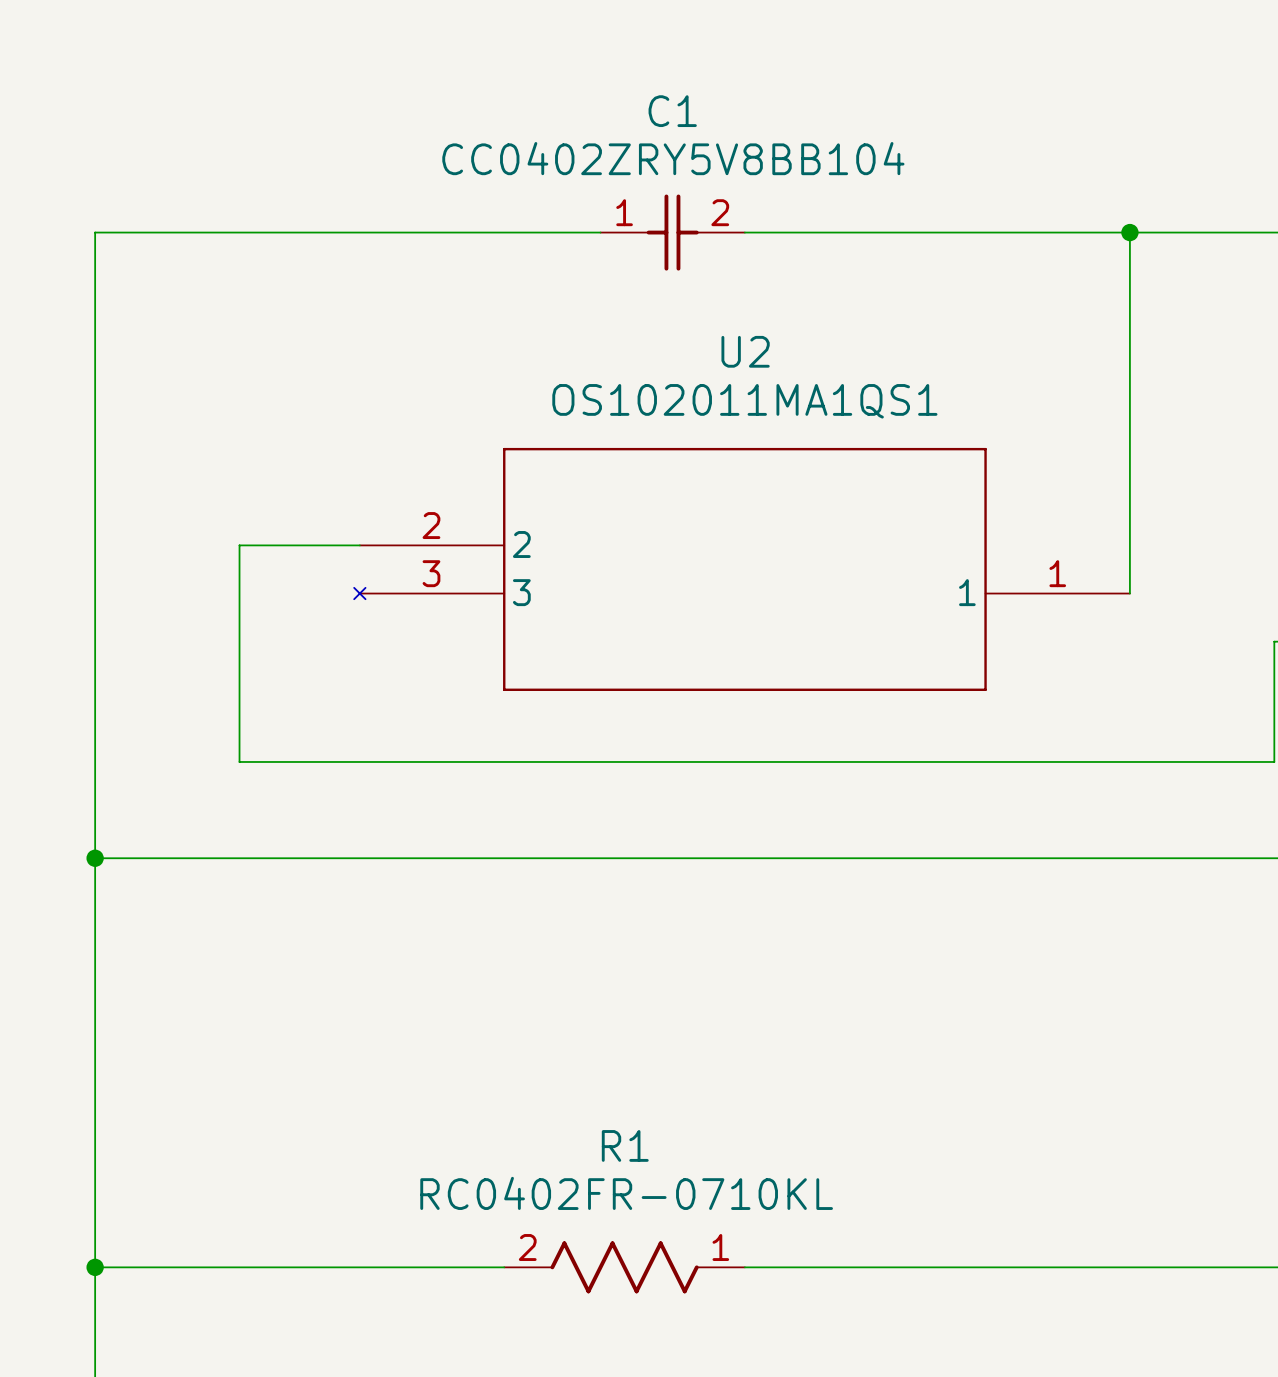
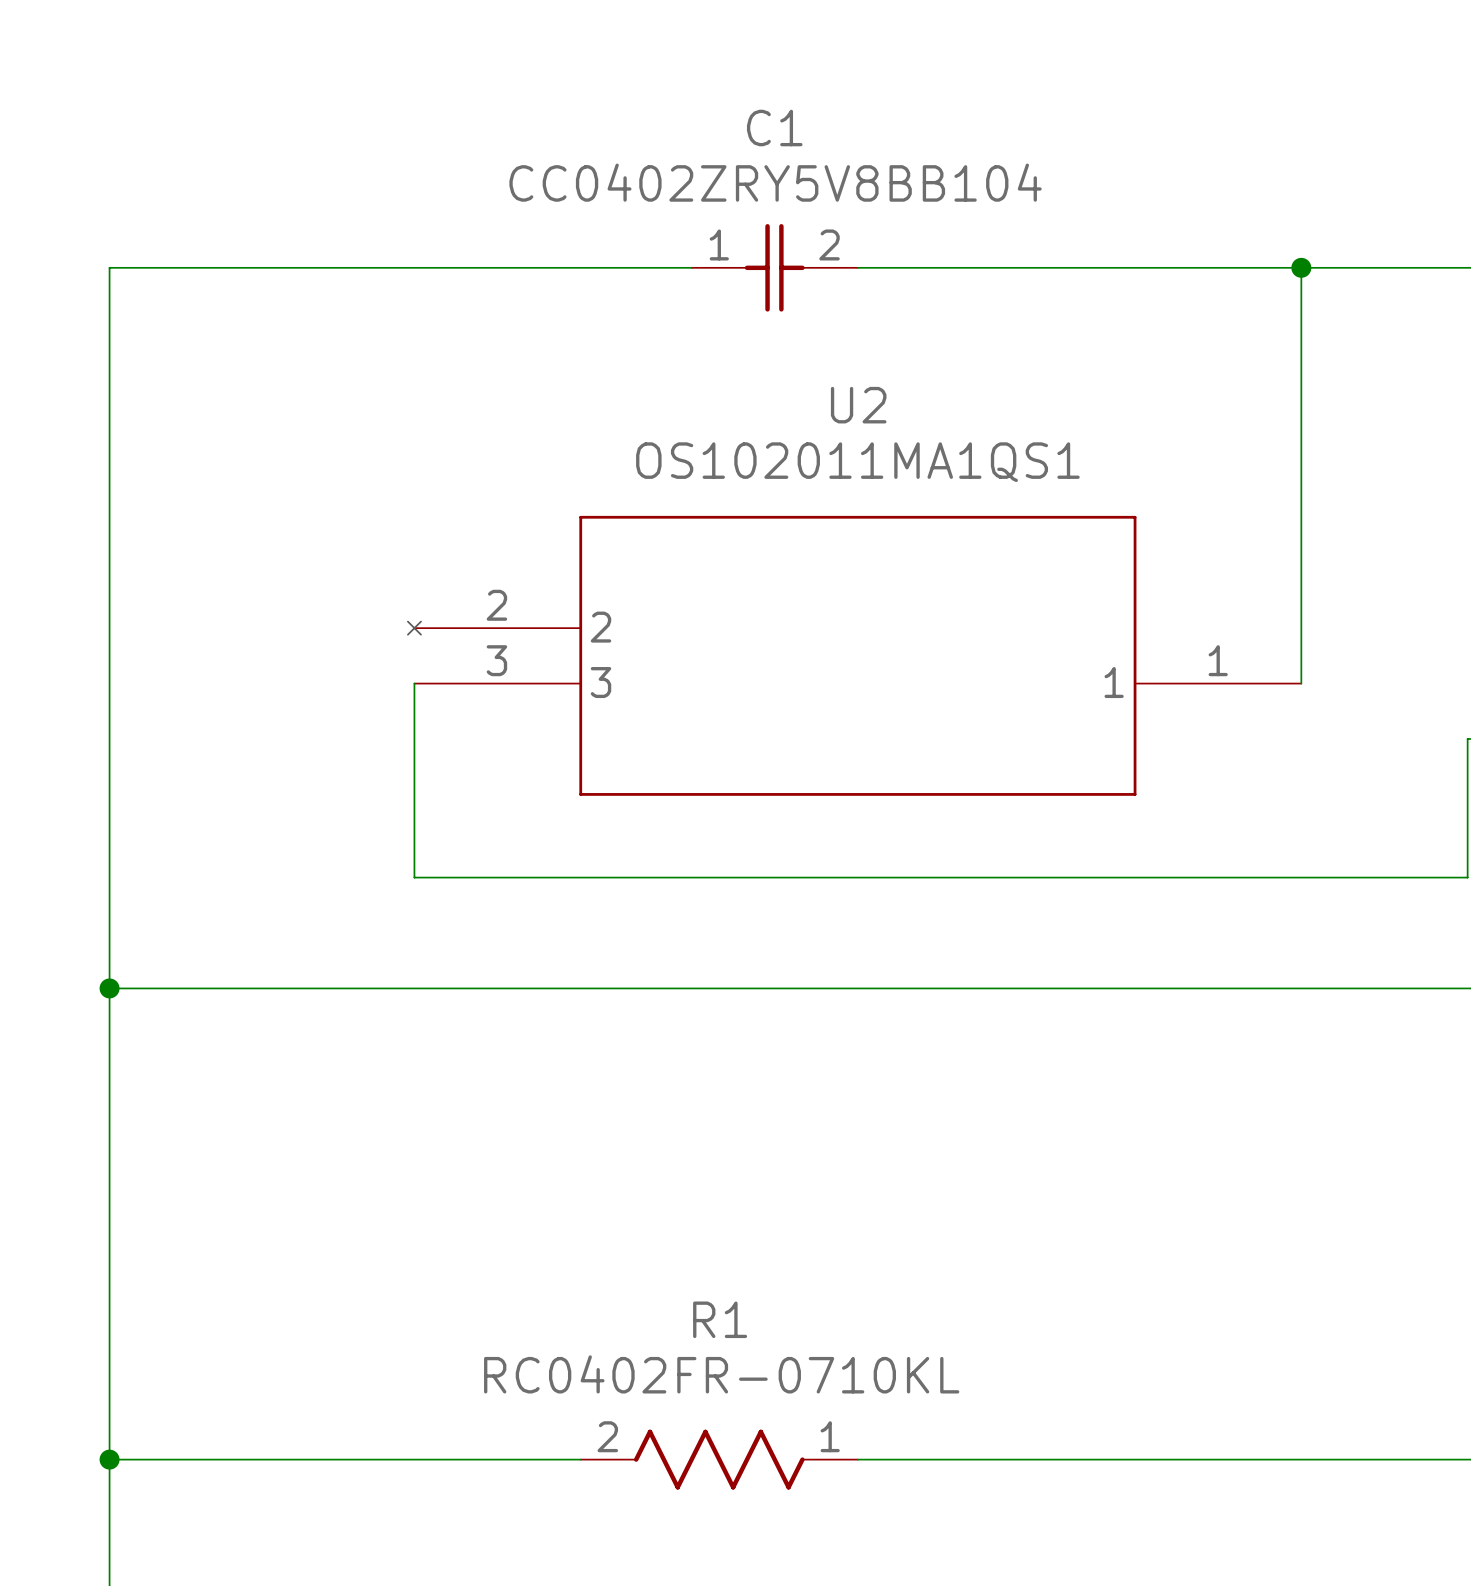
U2 symbol: [354, 447, 1130, 691] -> [407, 515, 1302, 796]
wire: (359, 545) (239, 545) (239, 761) (359, 761) -> (414, 683) (414, 877)

